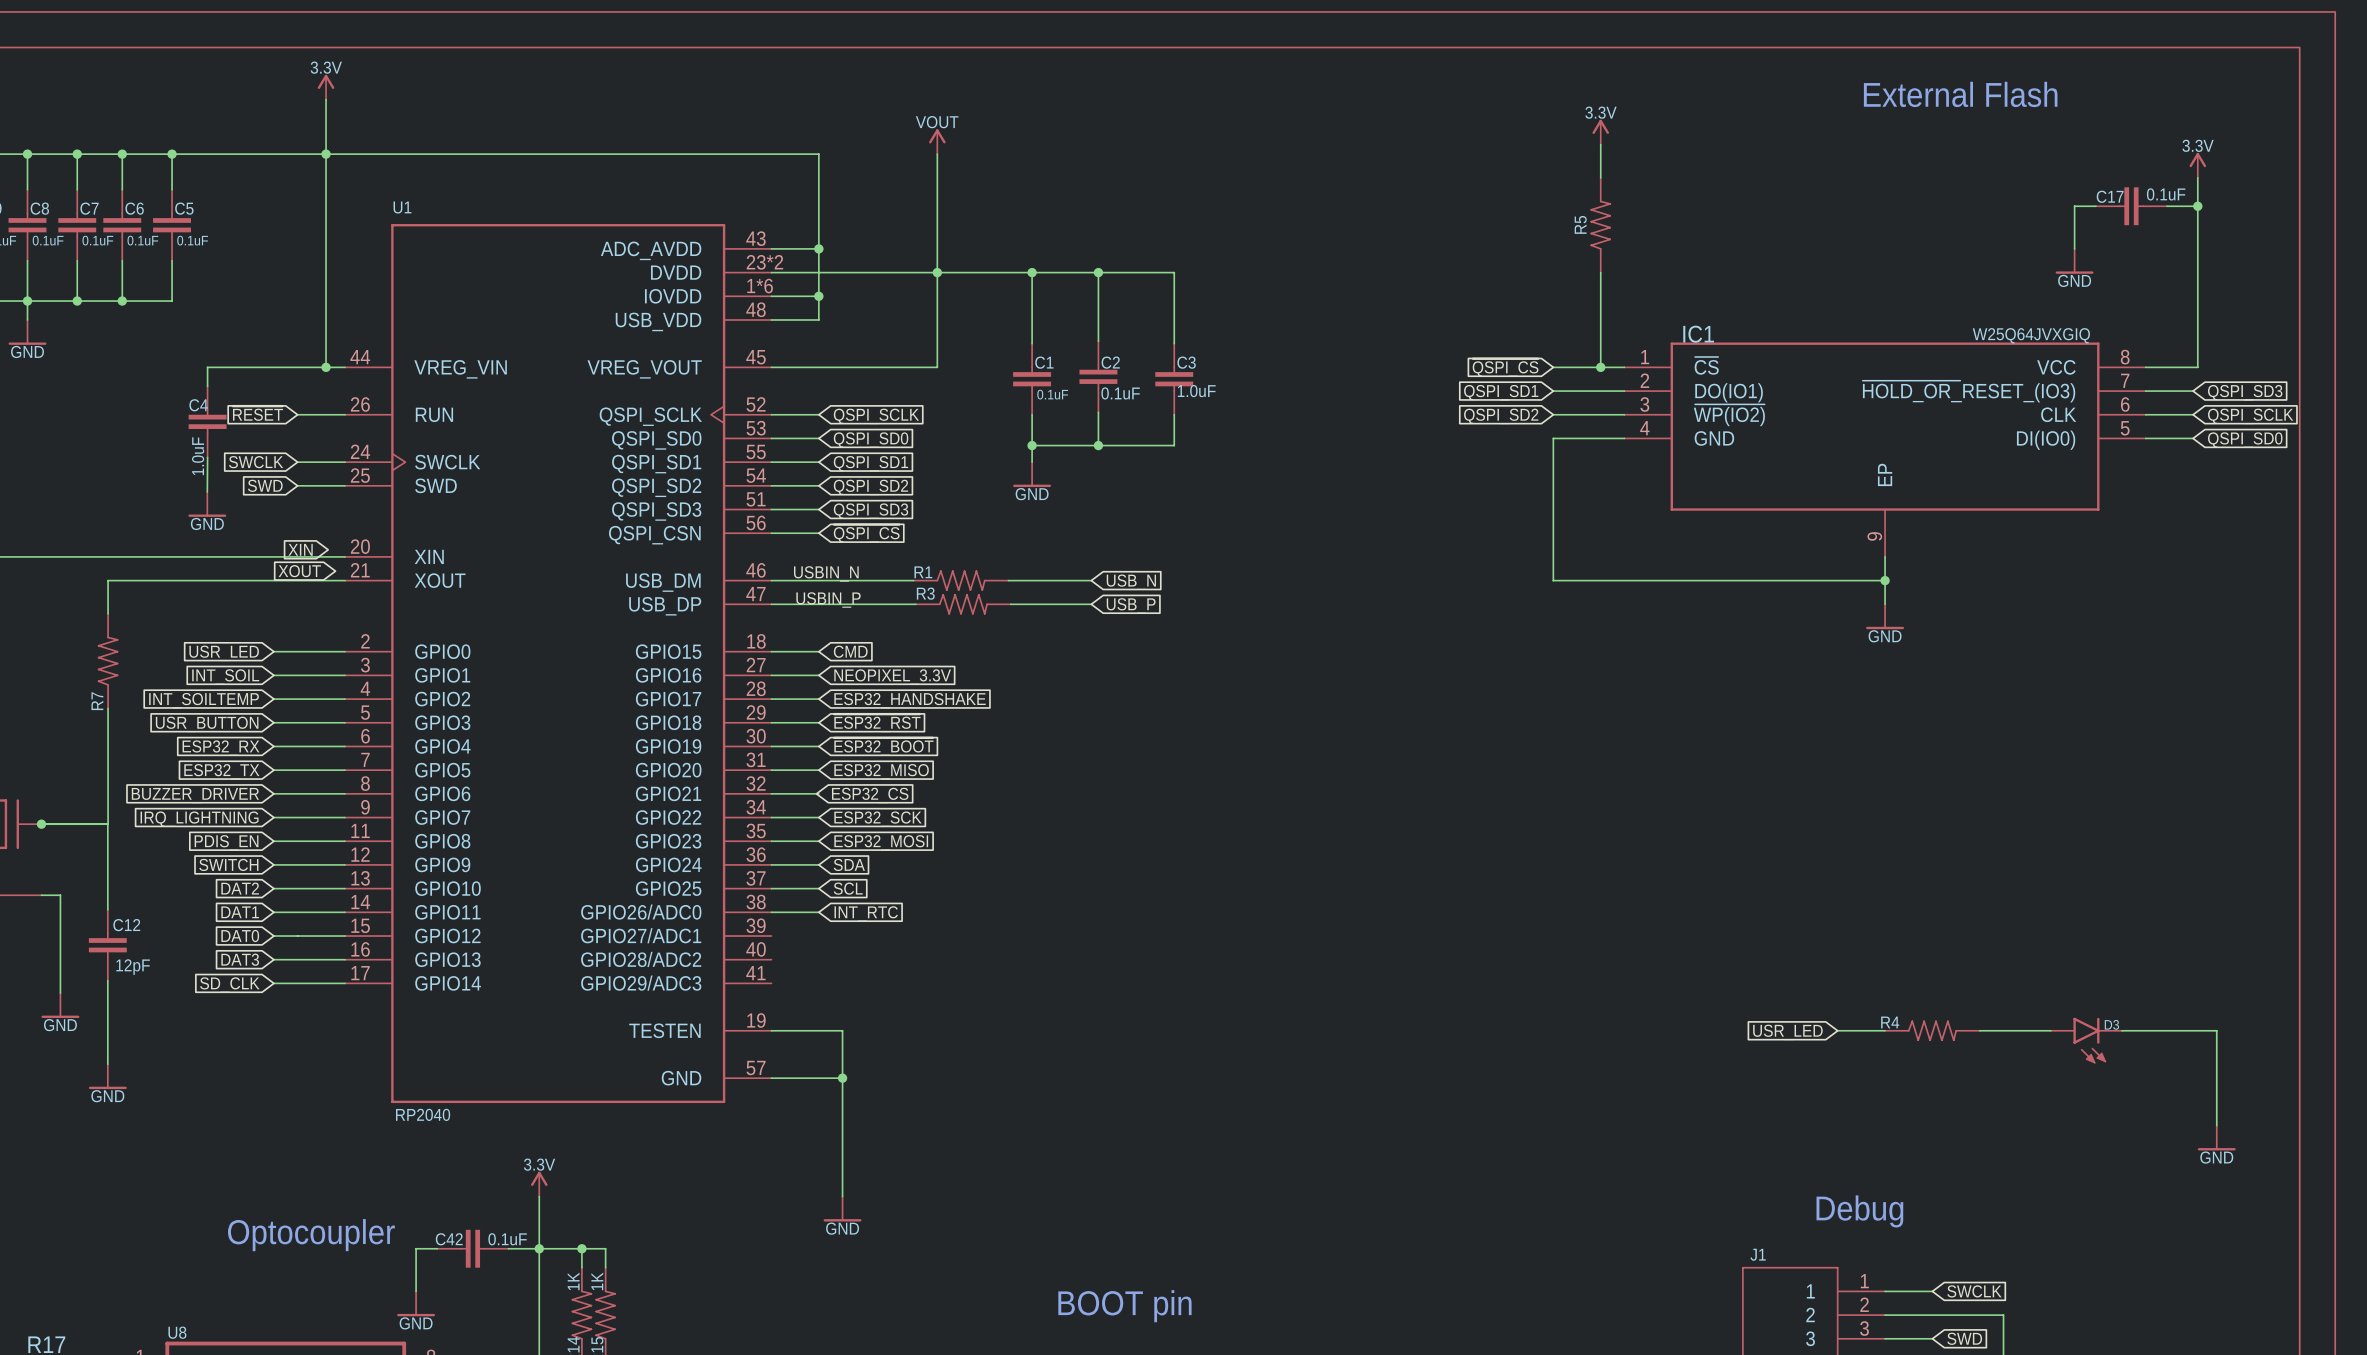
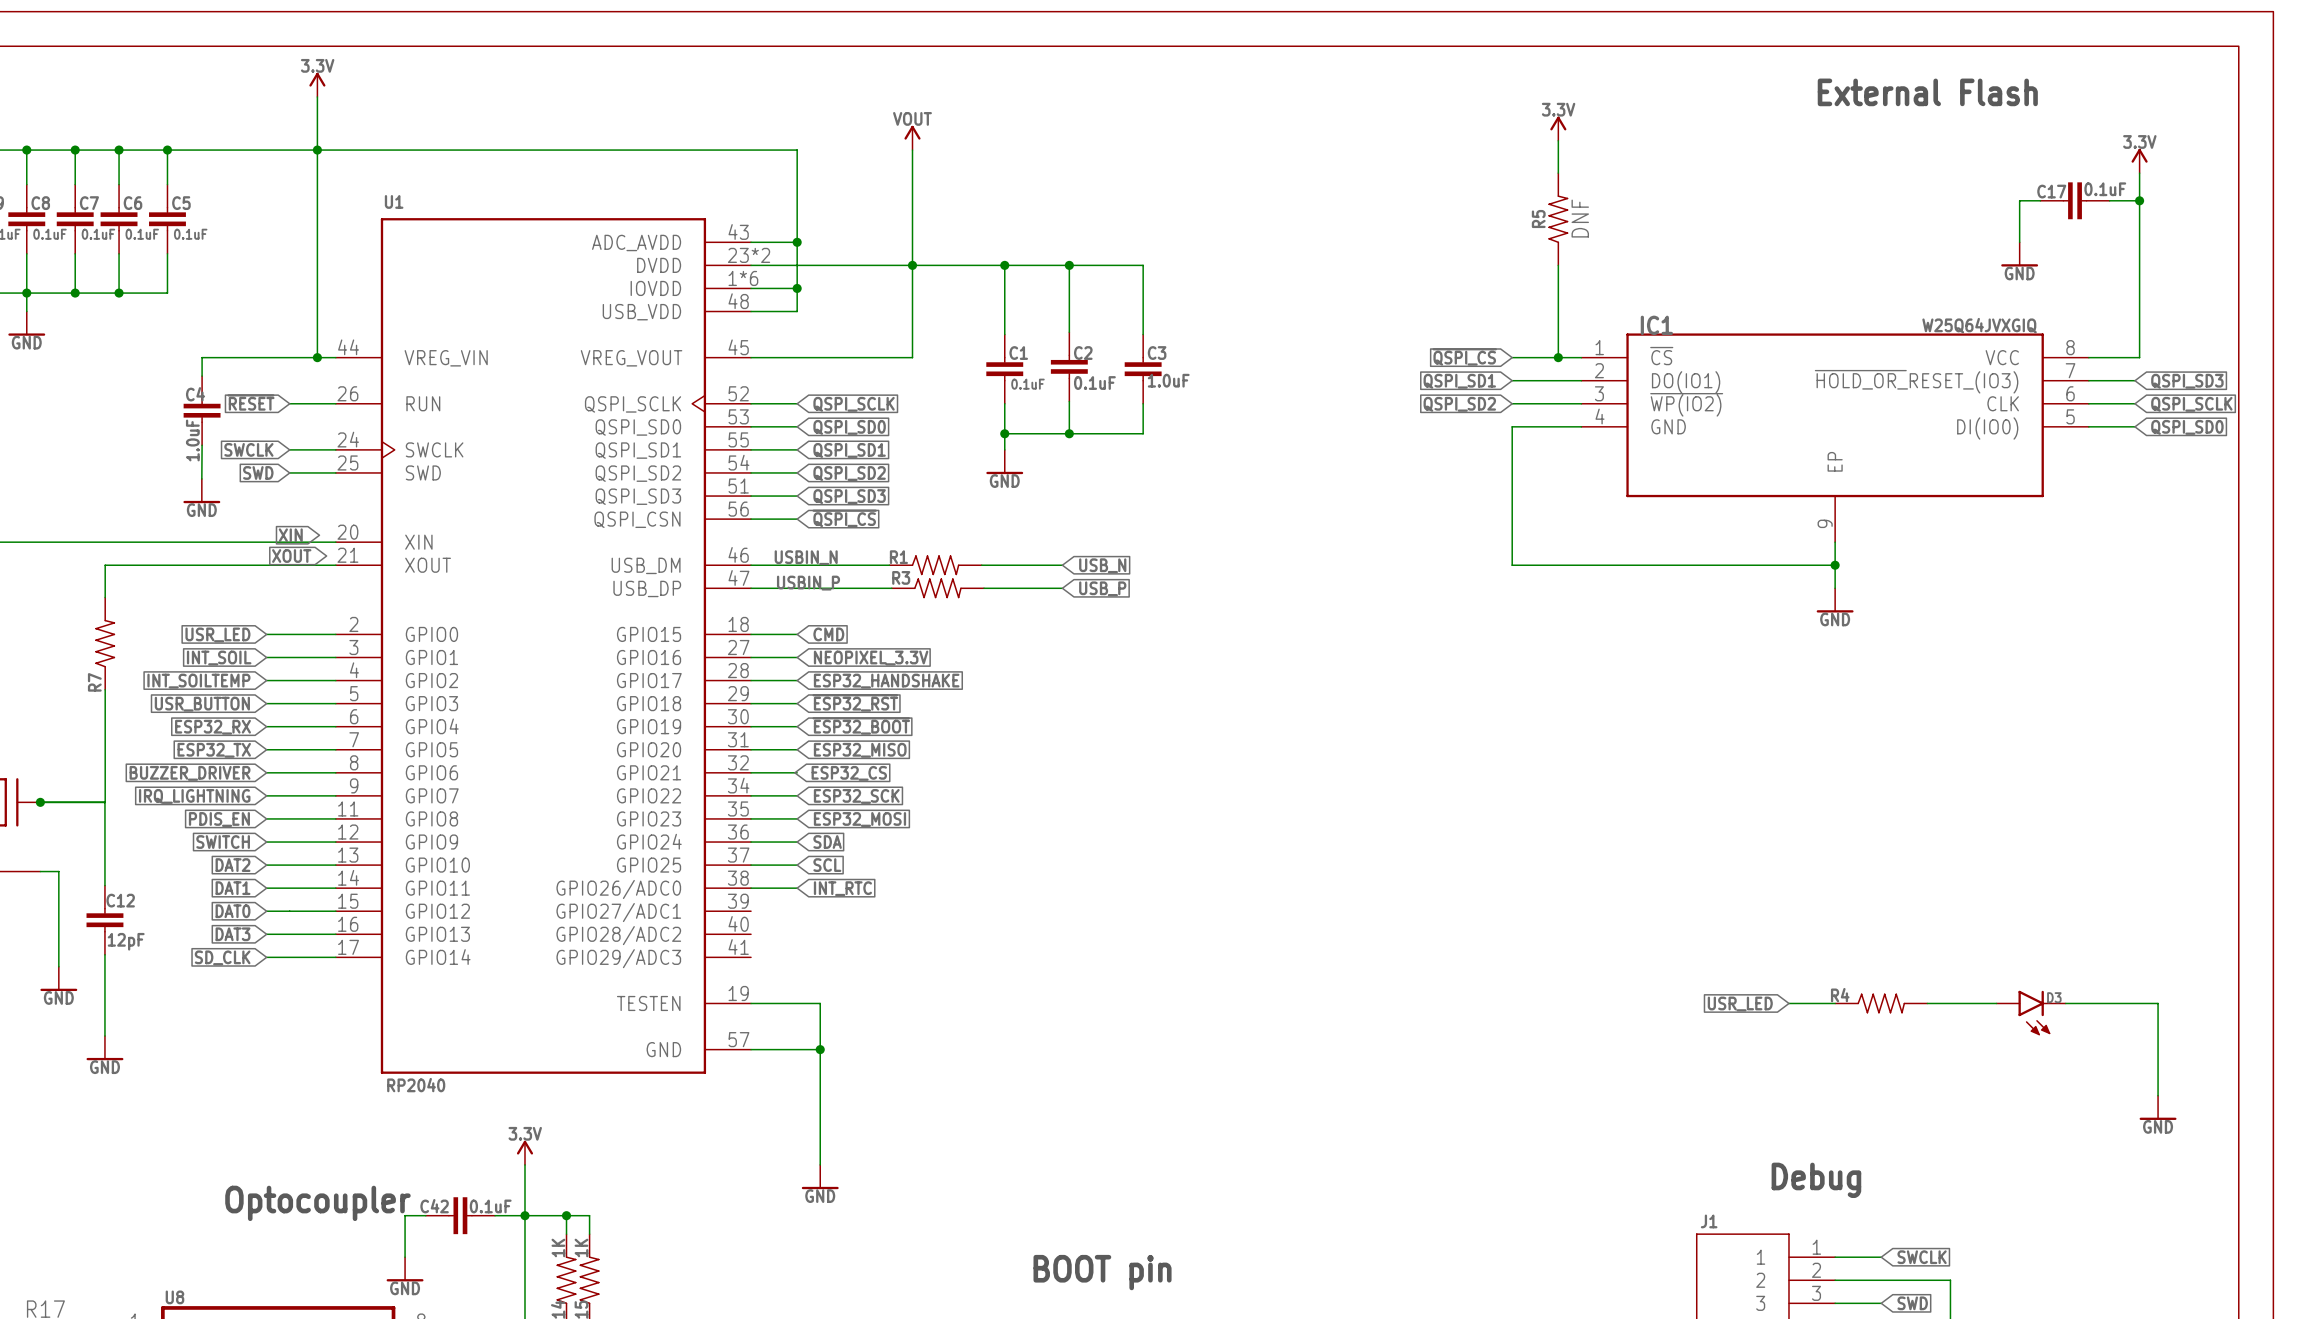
R5 value: none -> DNF (1580, 218)

